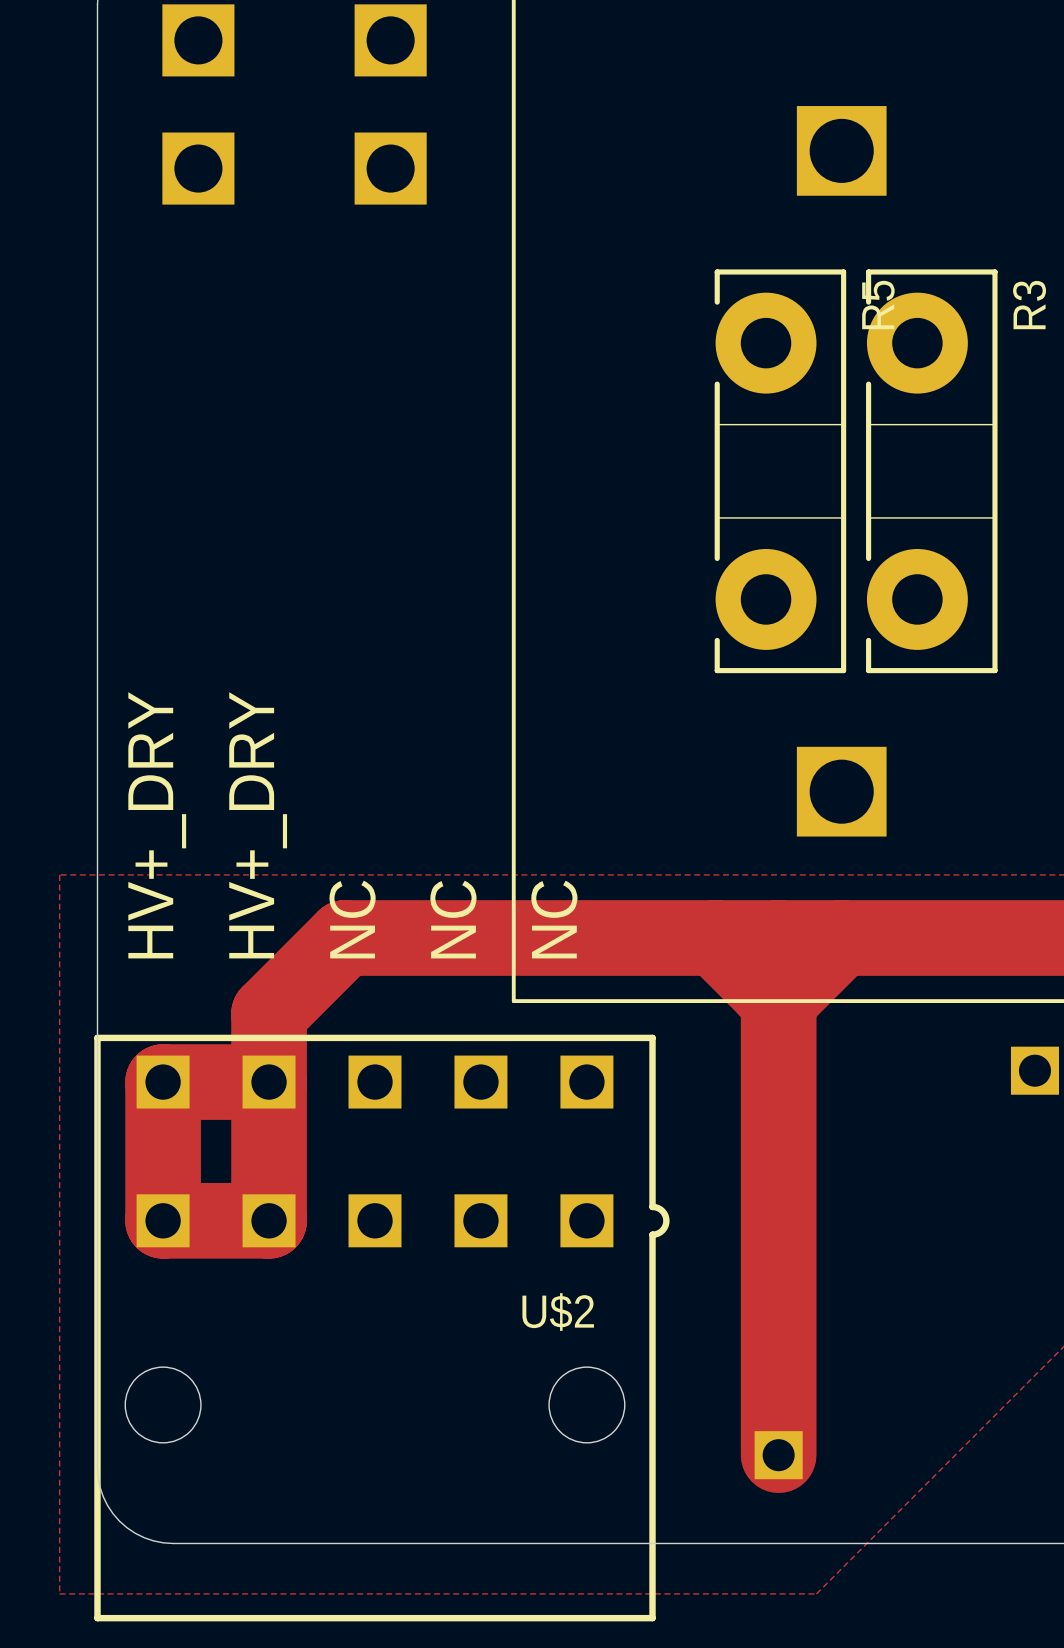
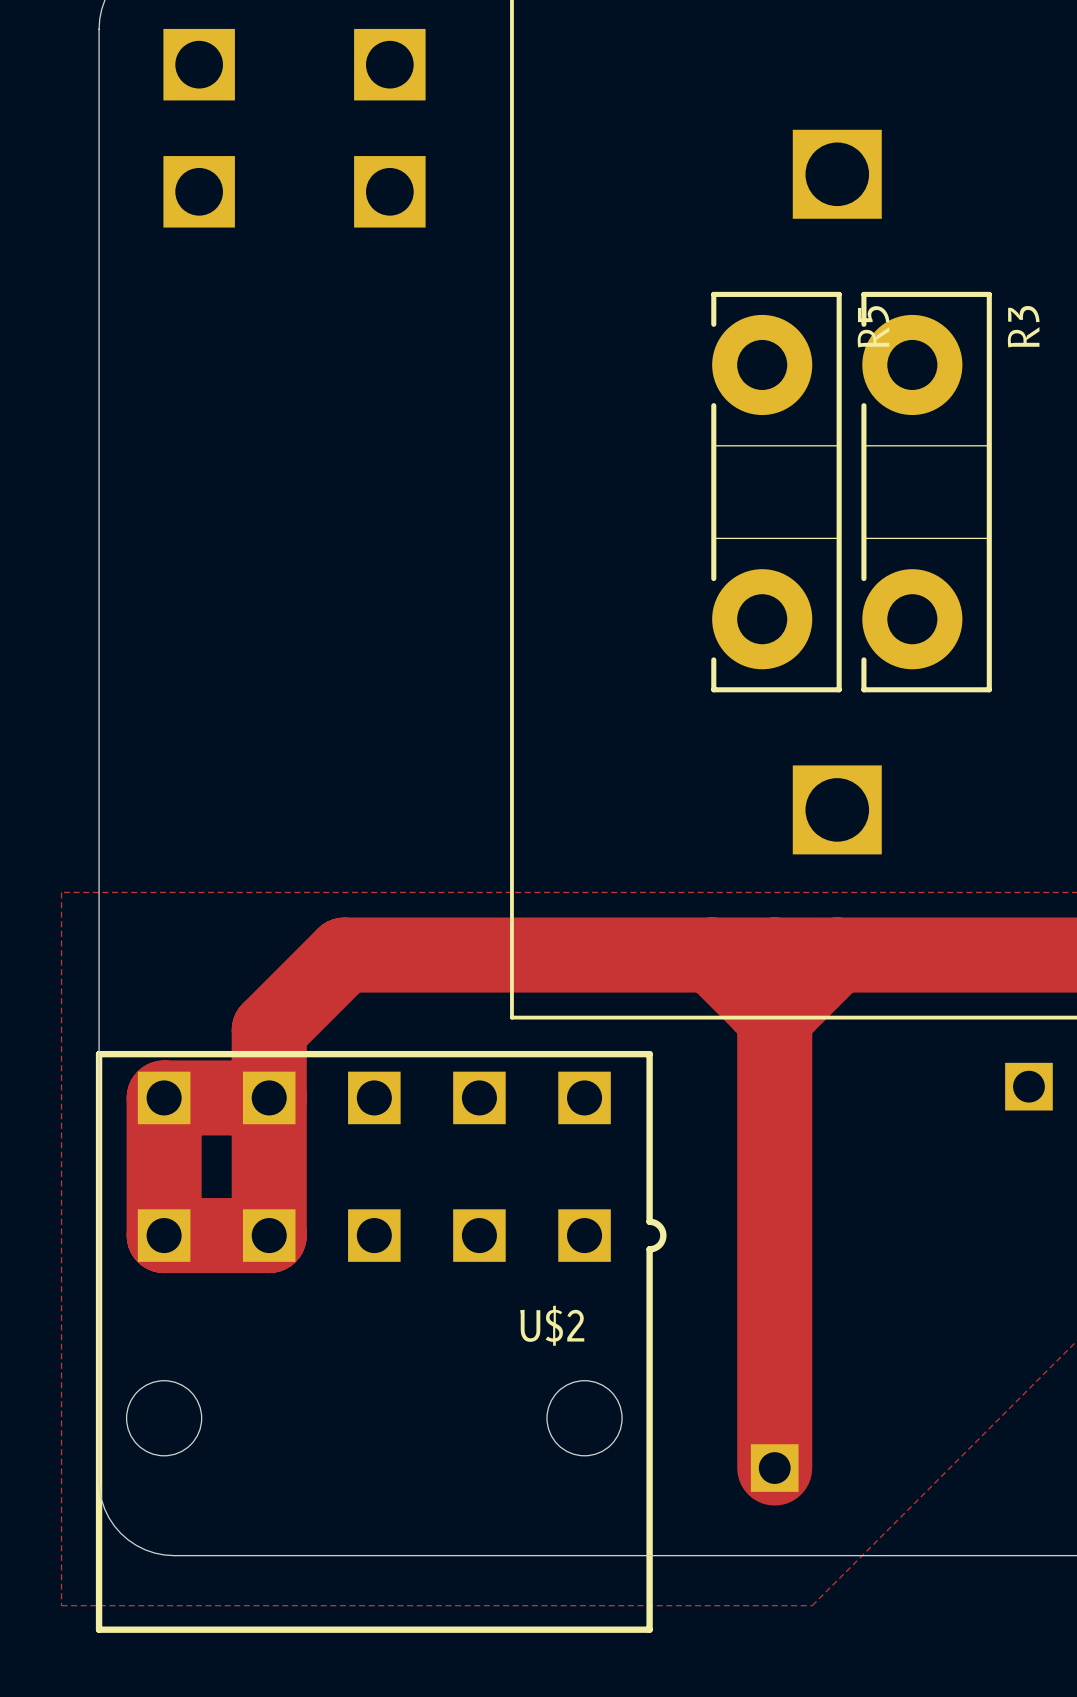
text: HV+_DRY (157, 825) -> none
text: HV+_DRY (258, 825) -> none
text: NC (352, 919) -> none
text: NC (453, 919) -> none
text: NC (554, 919) -> none

